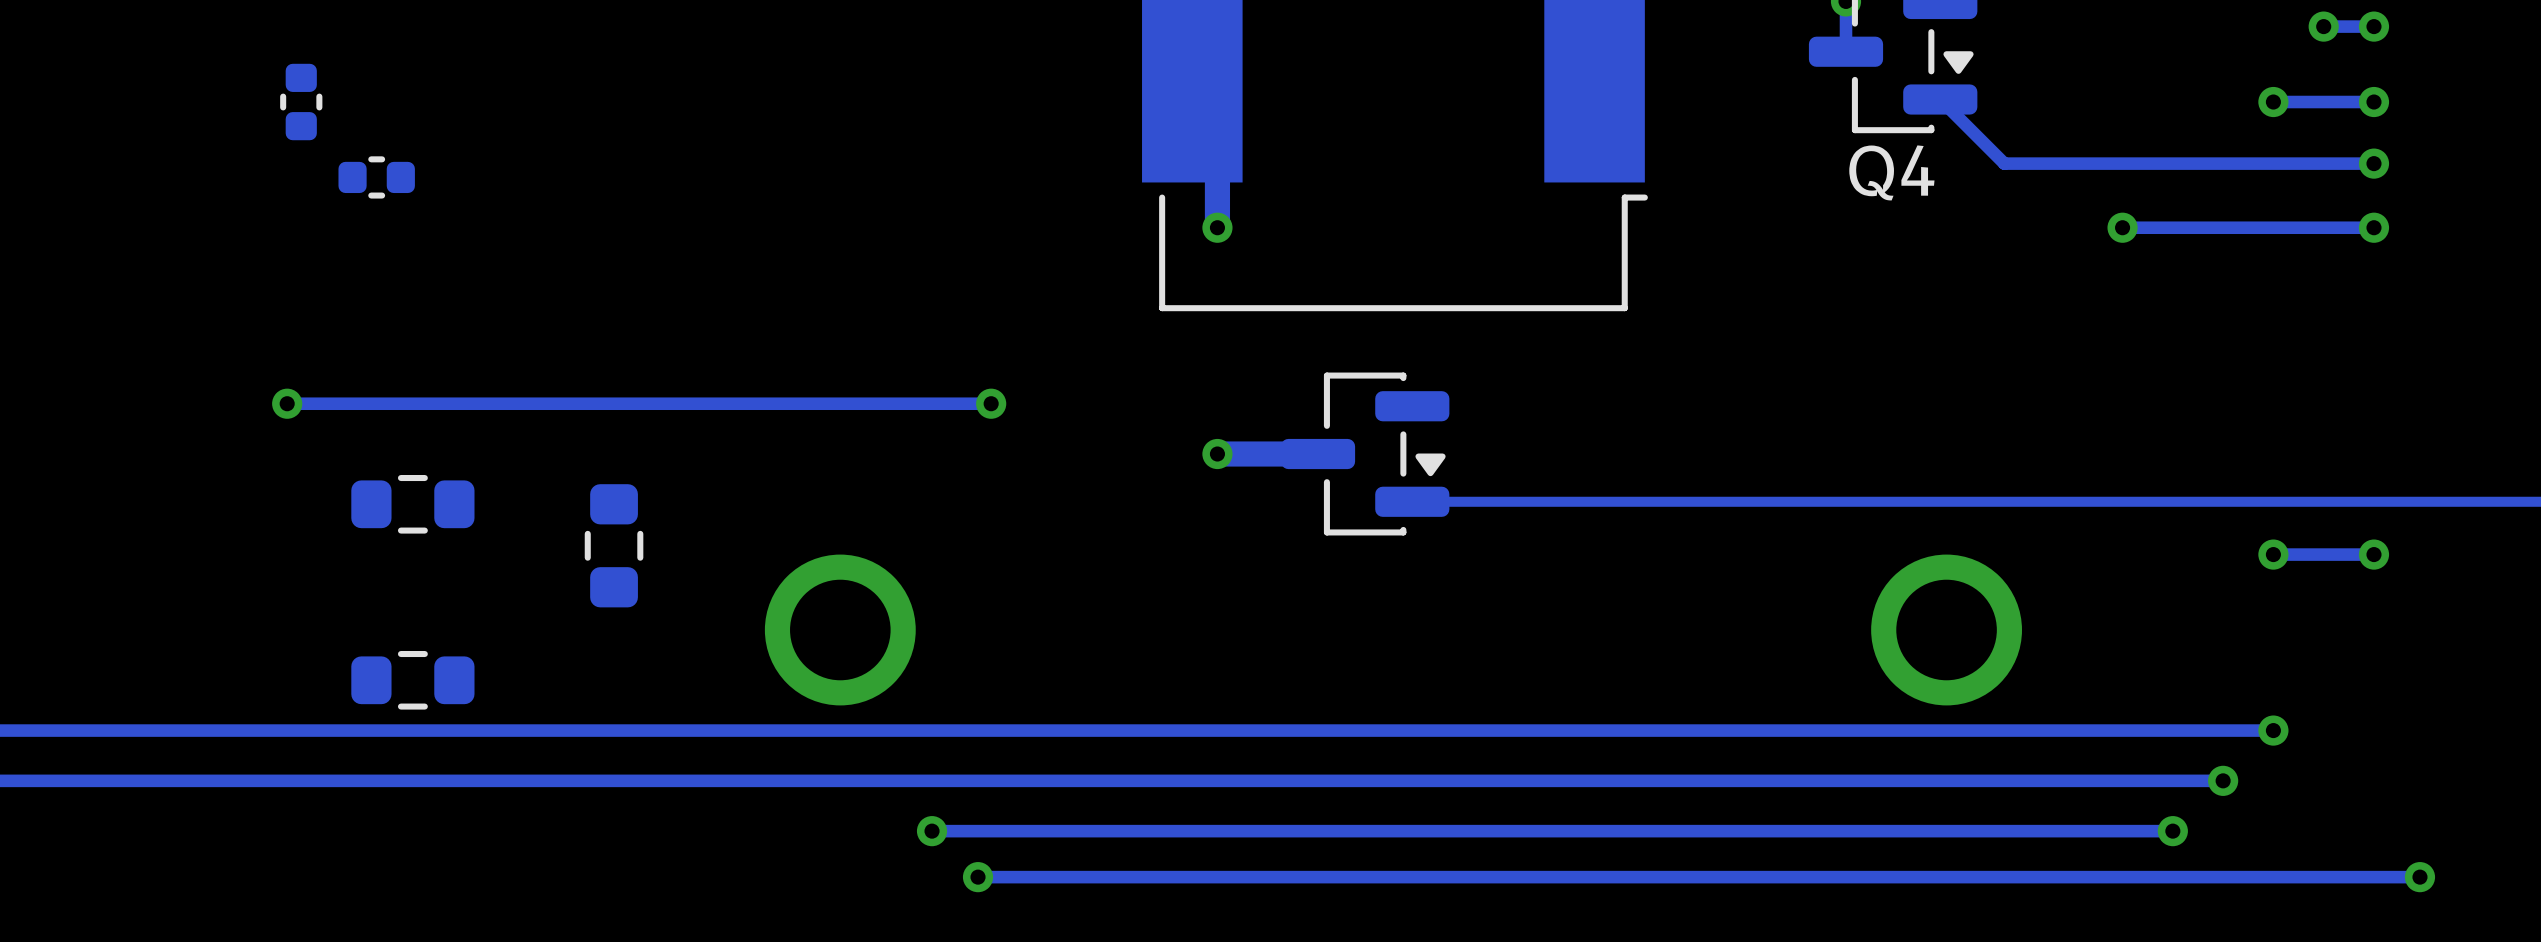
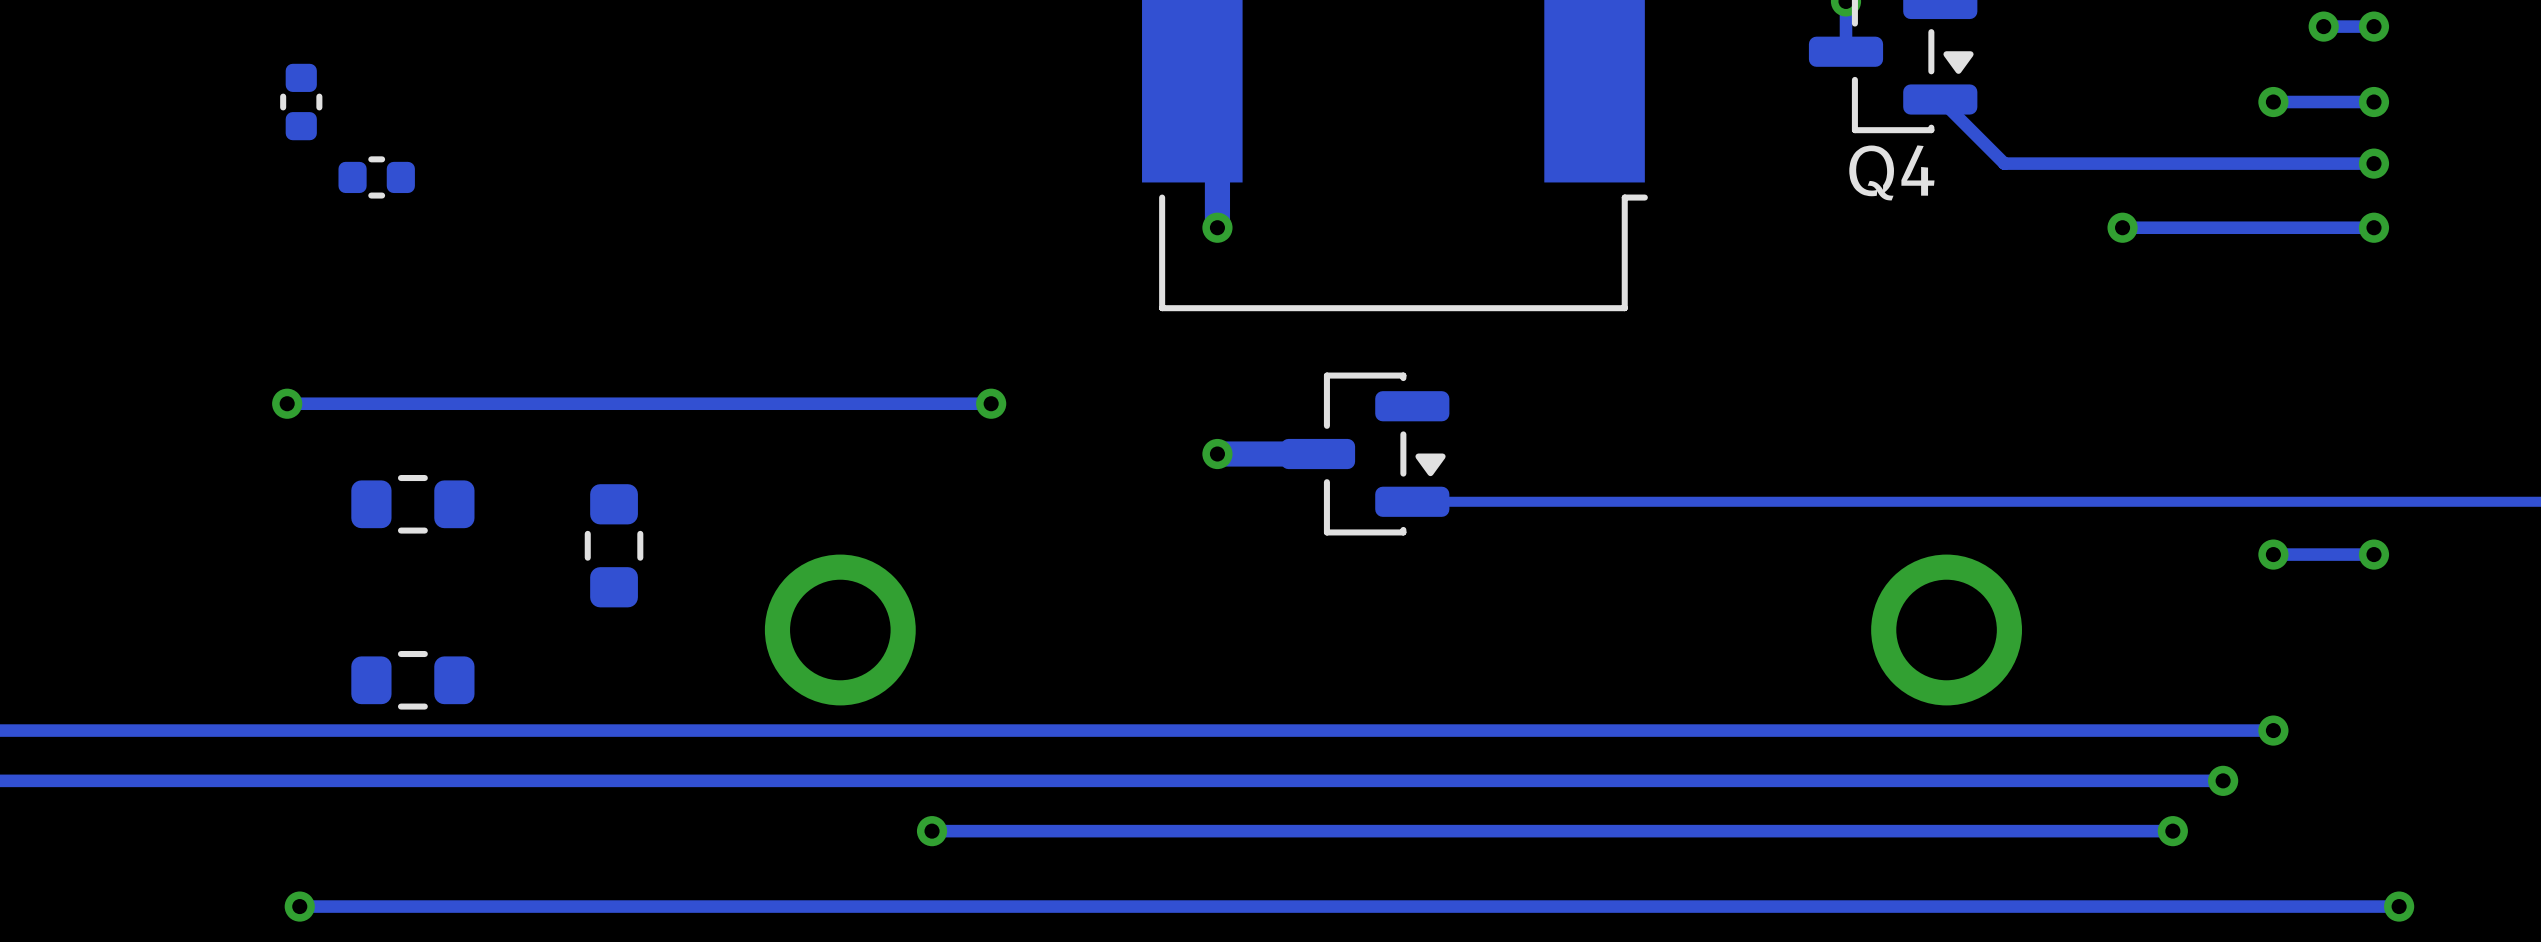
via: (978, 877) -> none
track: (2419, 877) (978, 877) -> none
via position: (2419, 877) -> (2399, 906)
via: none -> (299, 906)
track: none -> (2399, 906) (299, 906)

